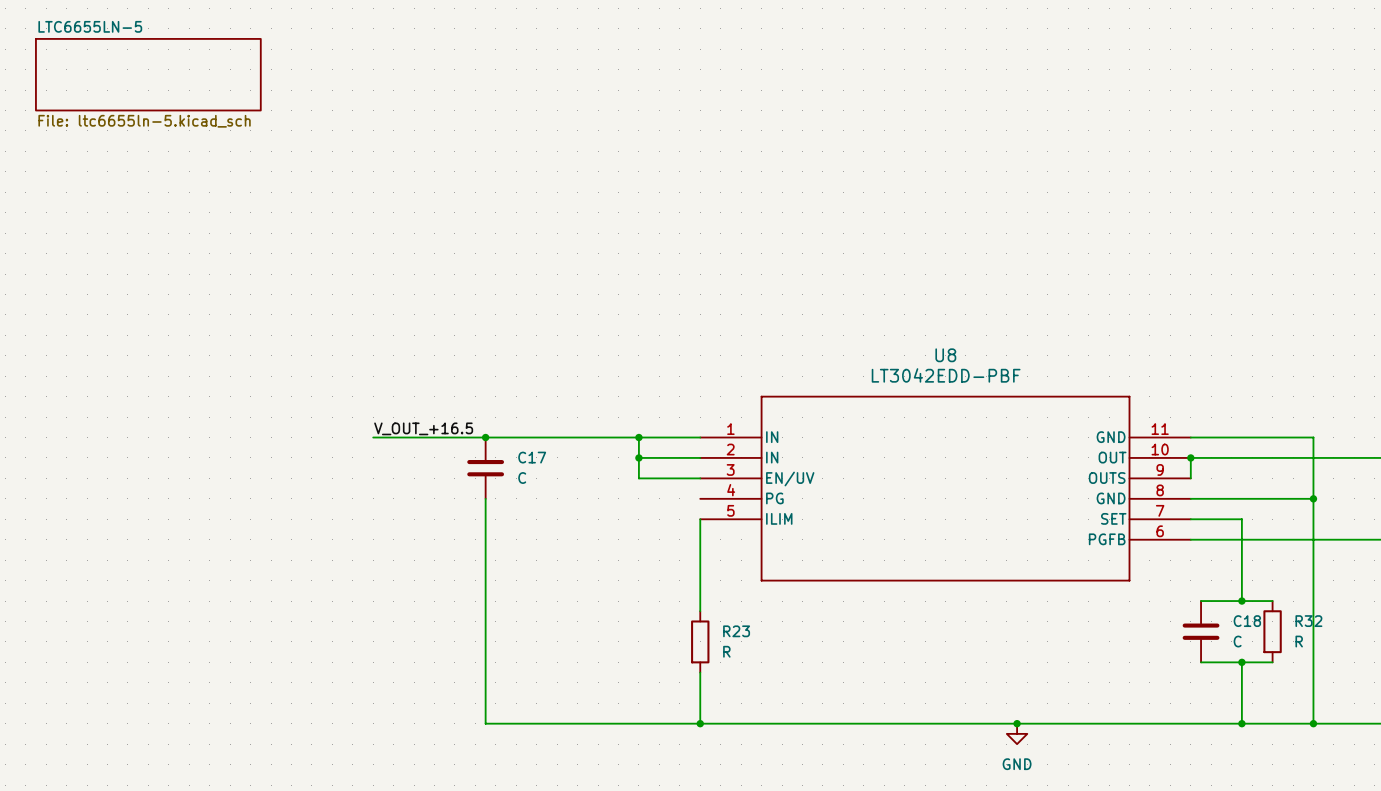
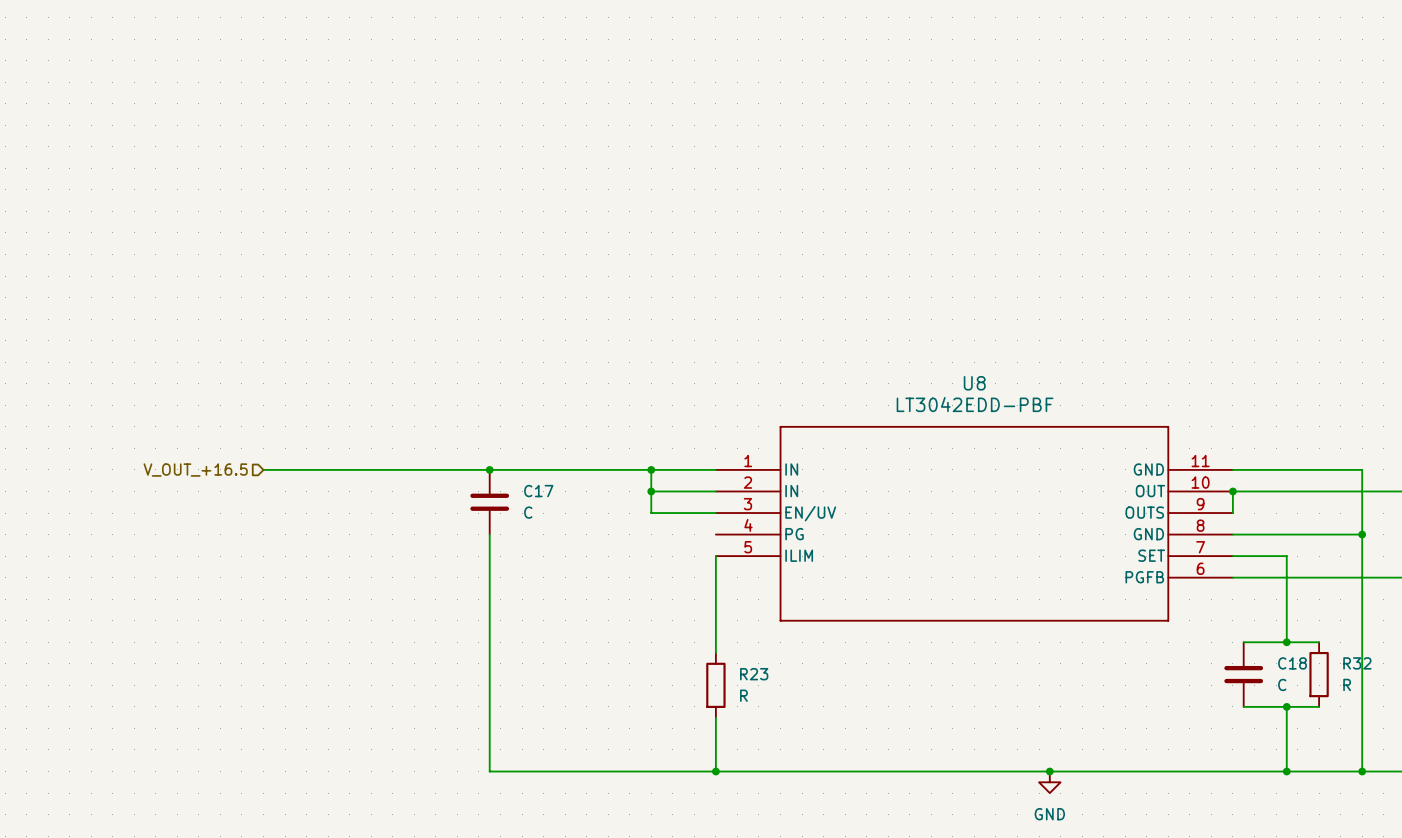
sheet LTC6655LN-5: File: ltc6655ln-5.kicad_sch (148, 74) -> none
label: V_OUT_+16.5 (423, 428) -> none
hierarchical label: none -> V_OUT_+16.5 (195, 470)
wire: none -> (263, 469) (371, 469)

